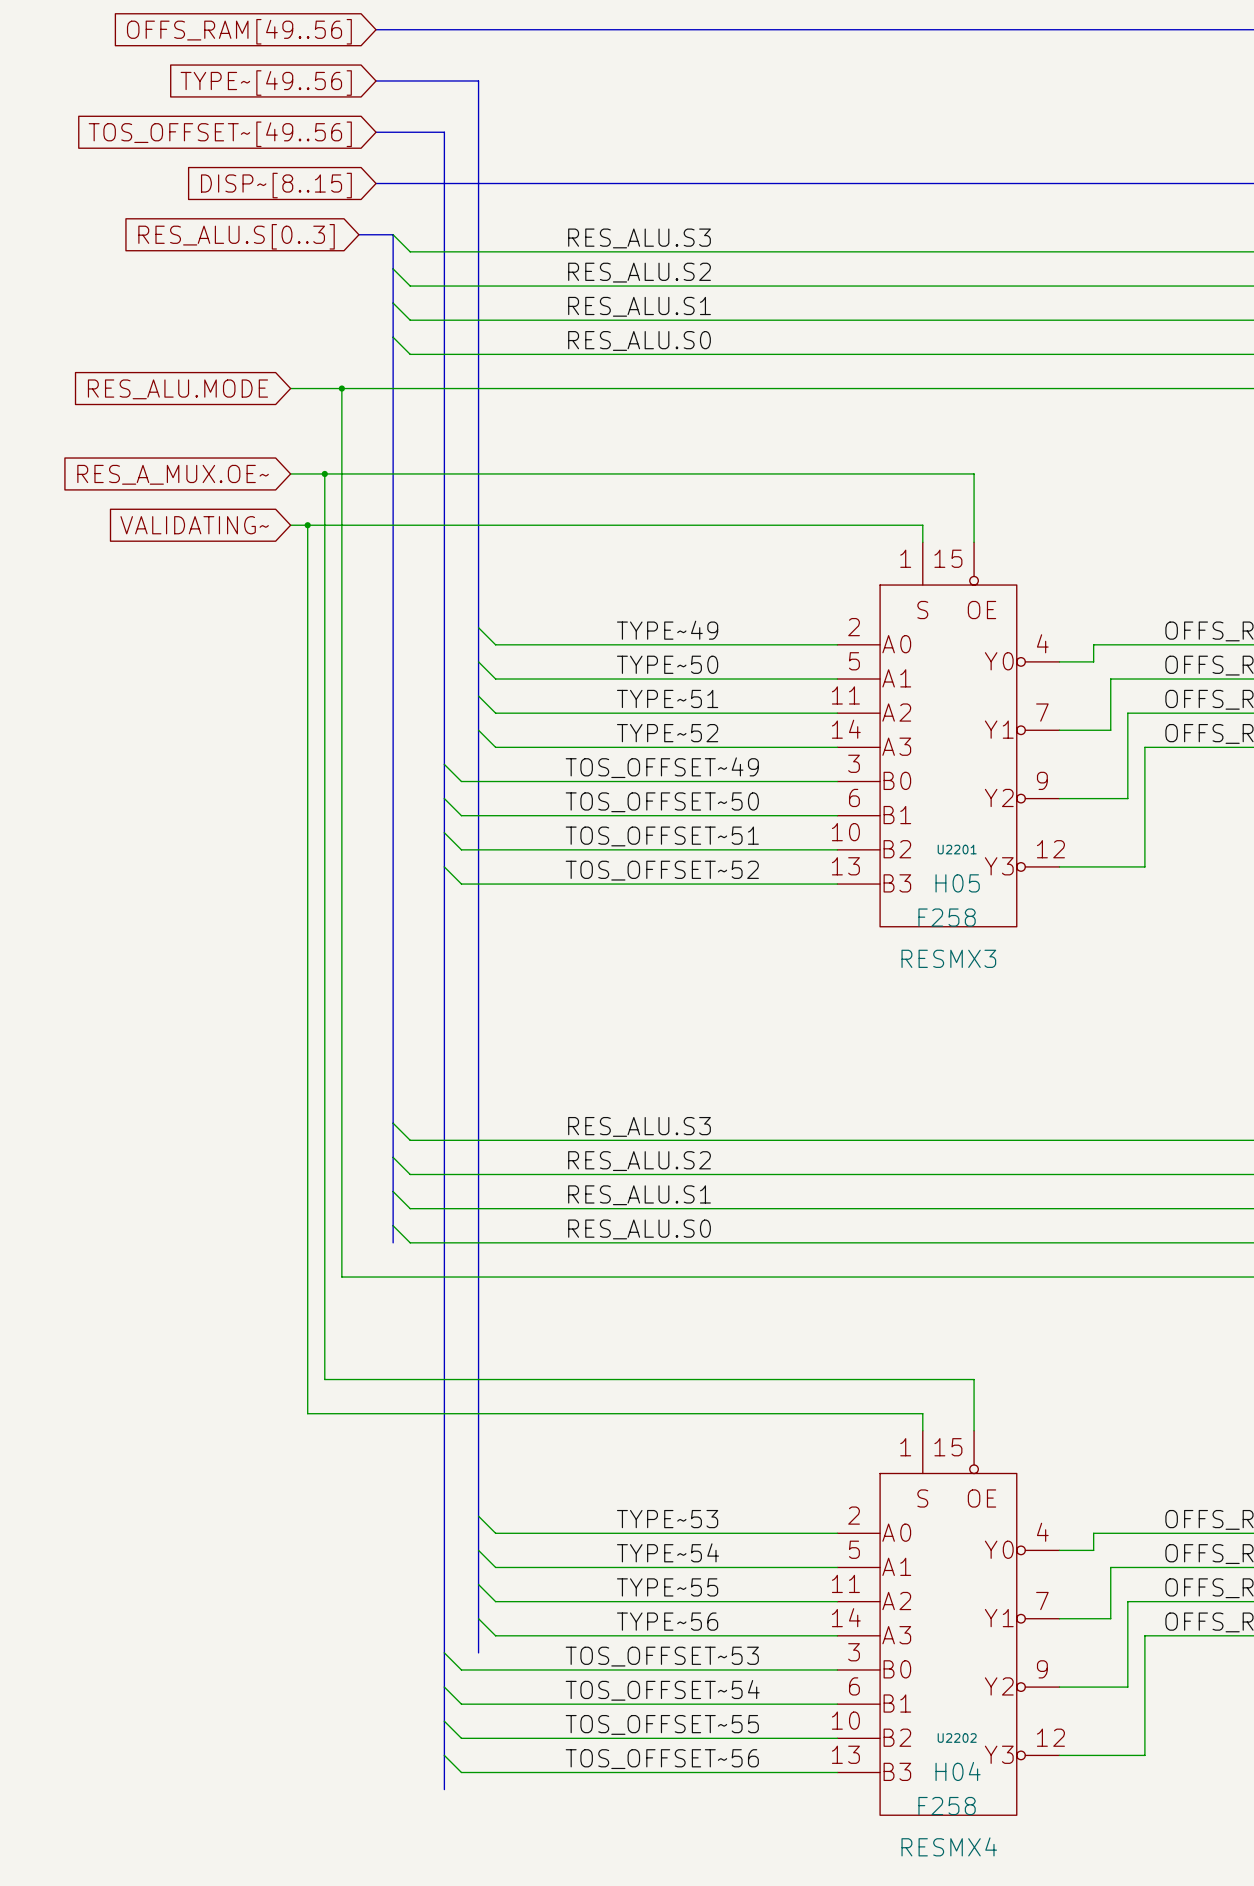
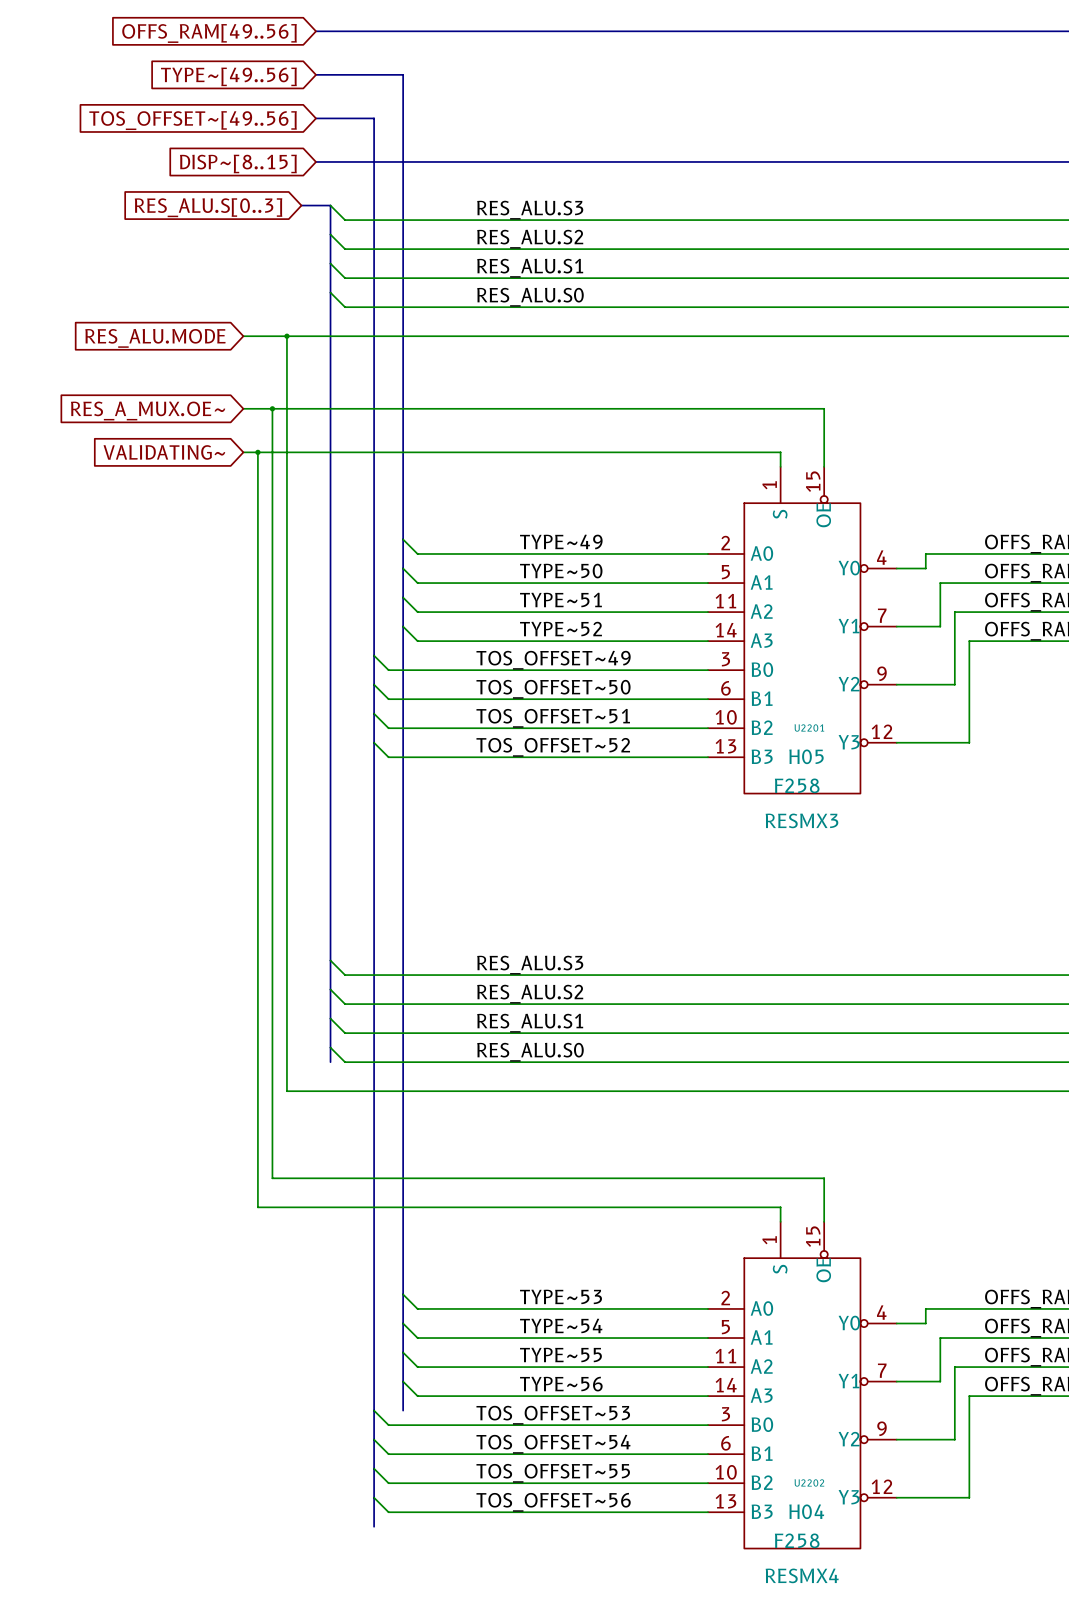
U2201 symbol: [837, 542, 1060, 927] -> [708, 466, 897, 794]
U2202 symbol: [837, 1430, 1060, 1816] -> [708, 1221, 897, 1549]

